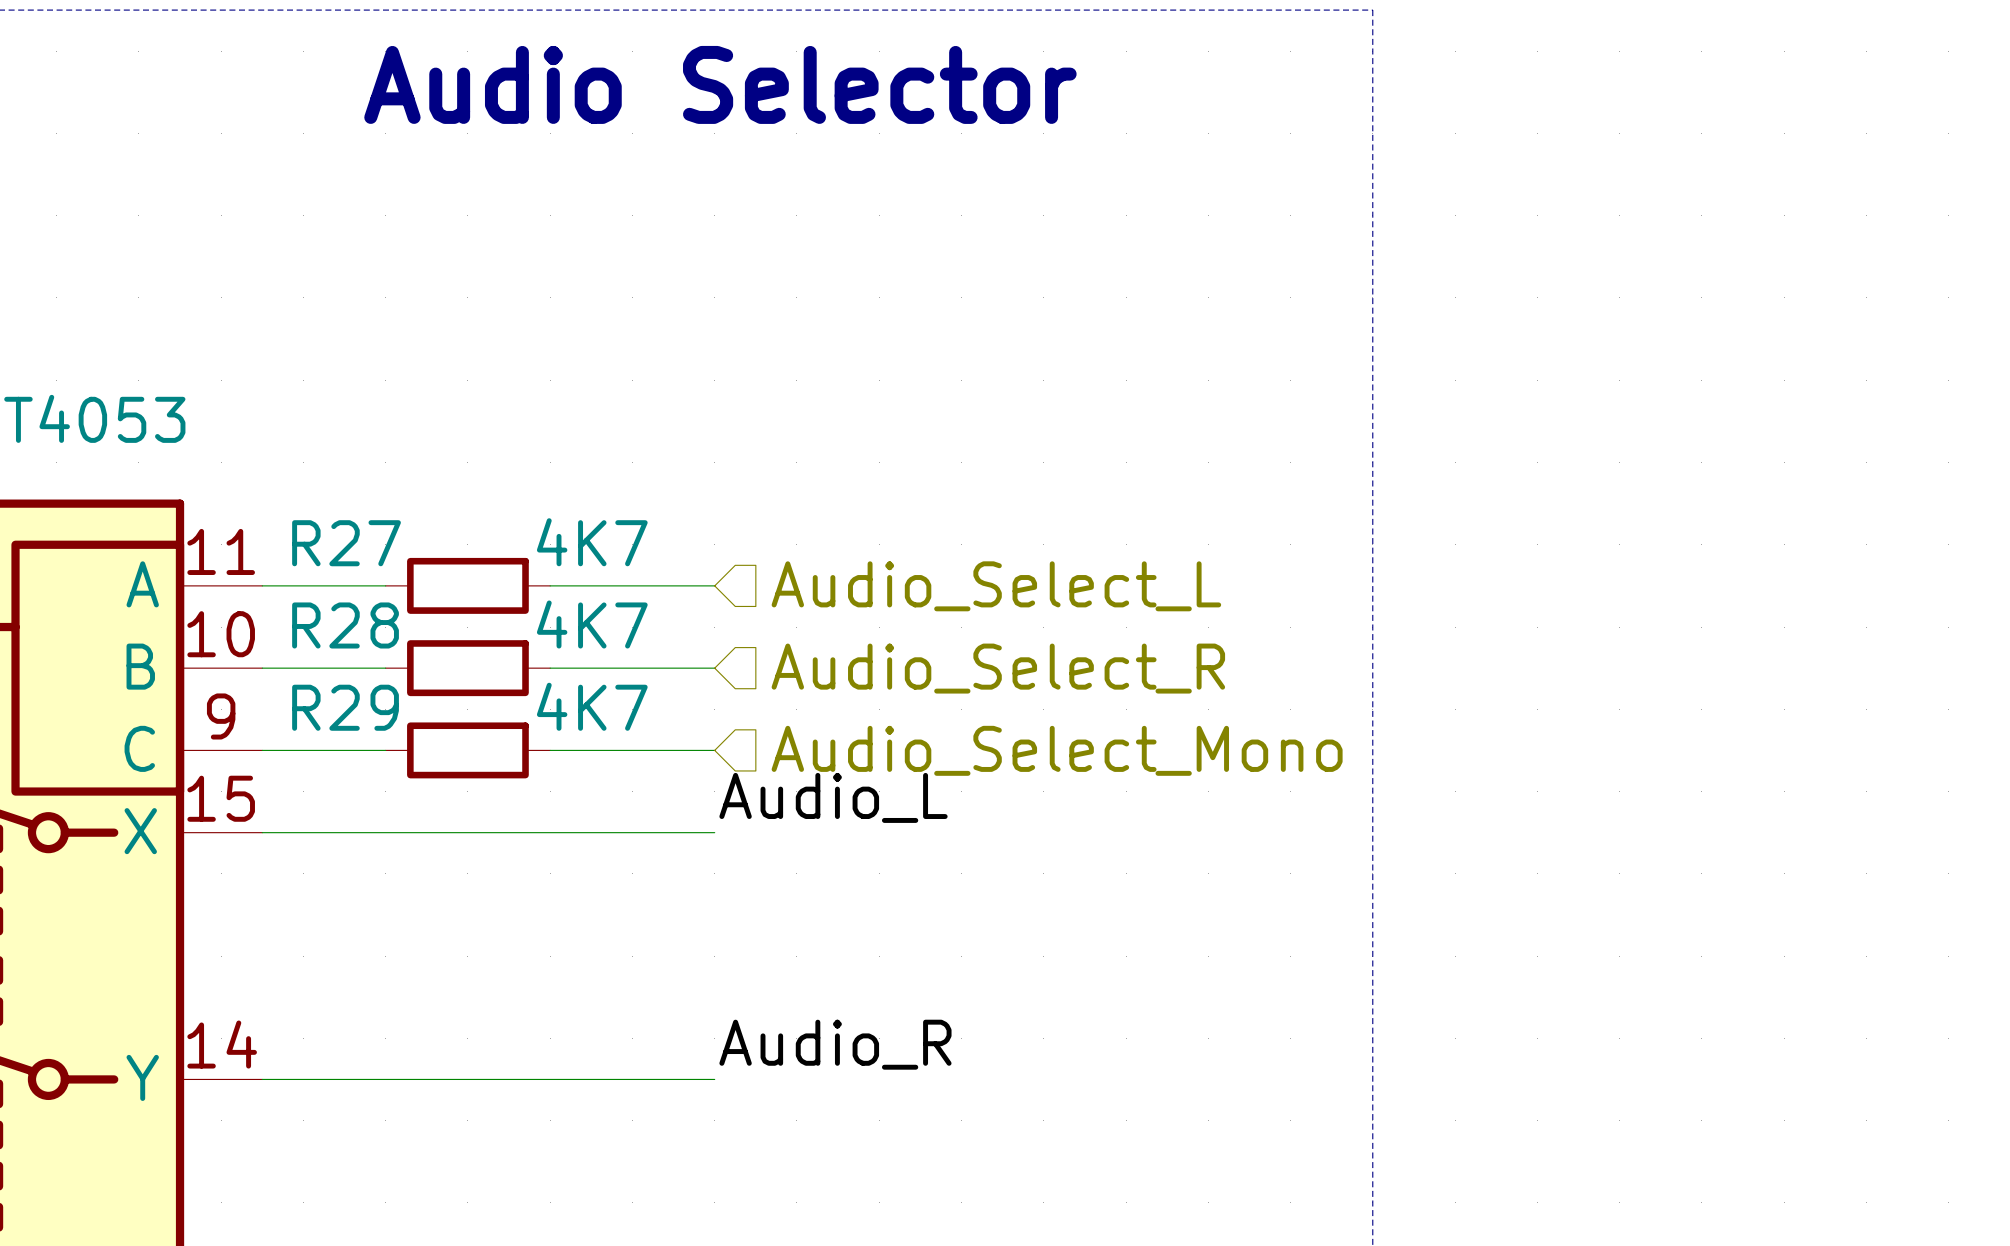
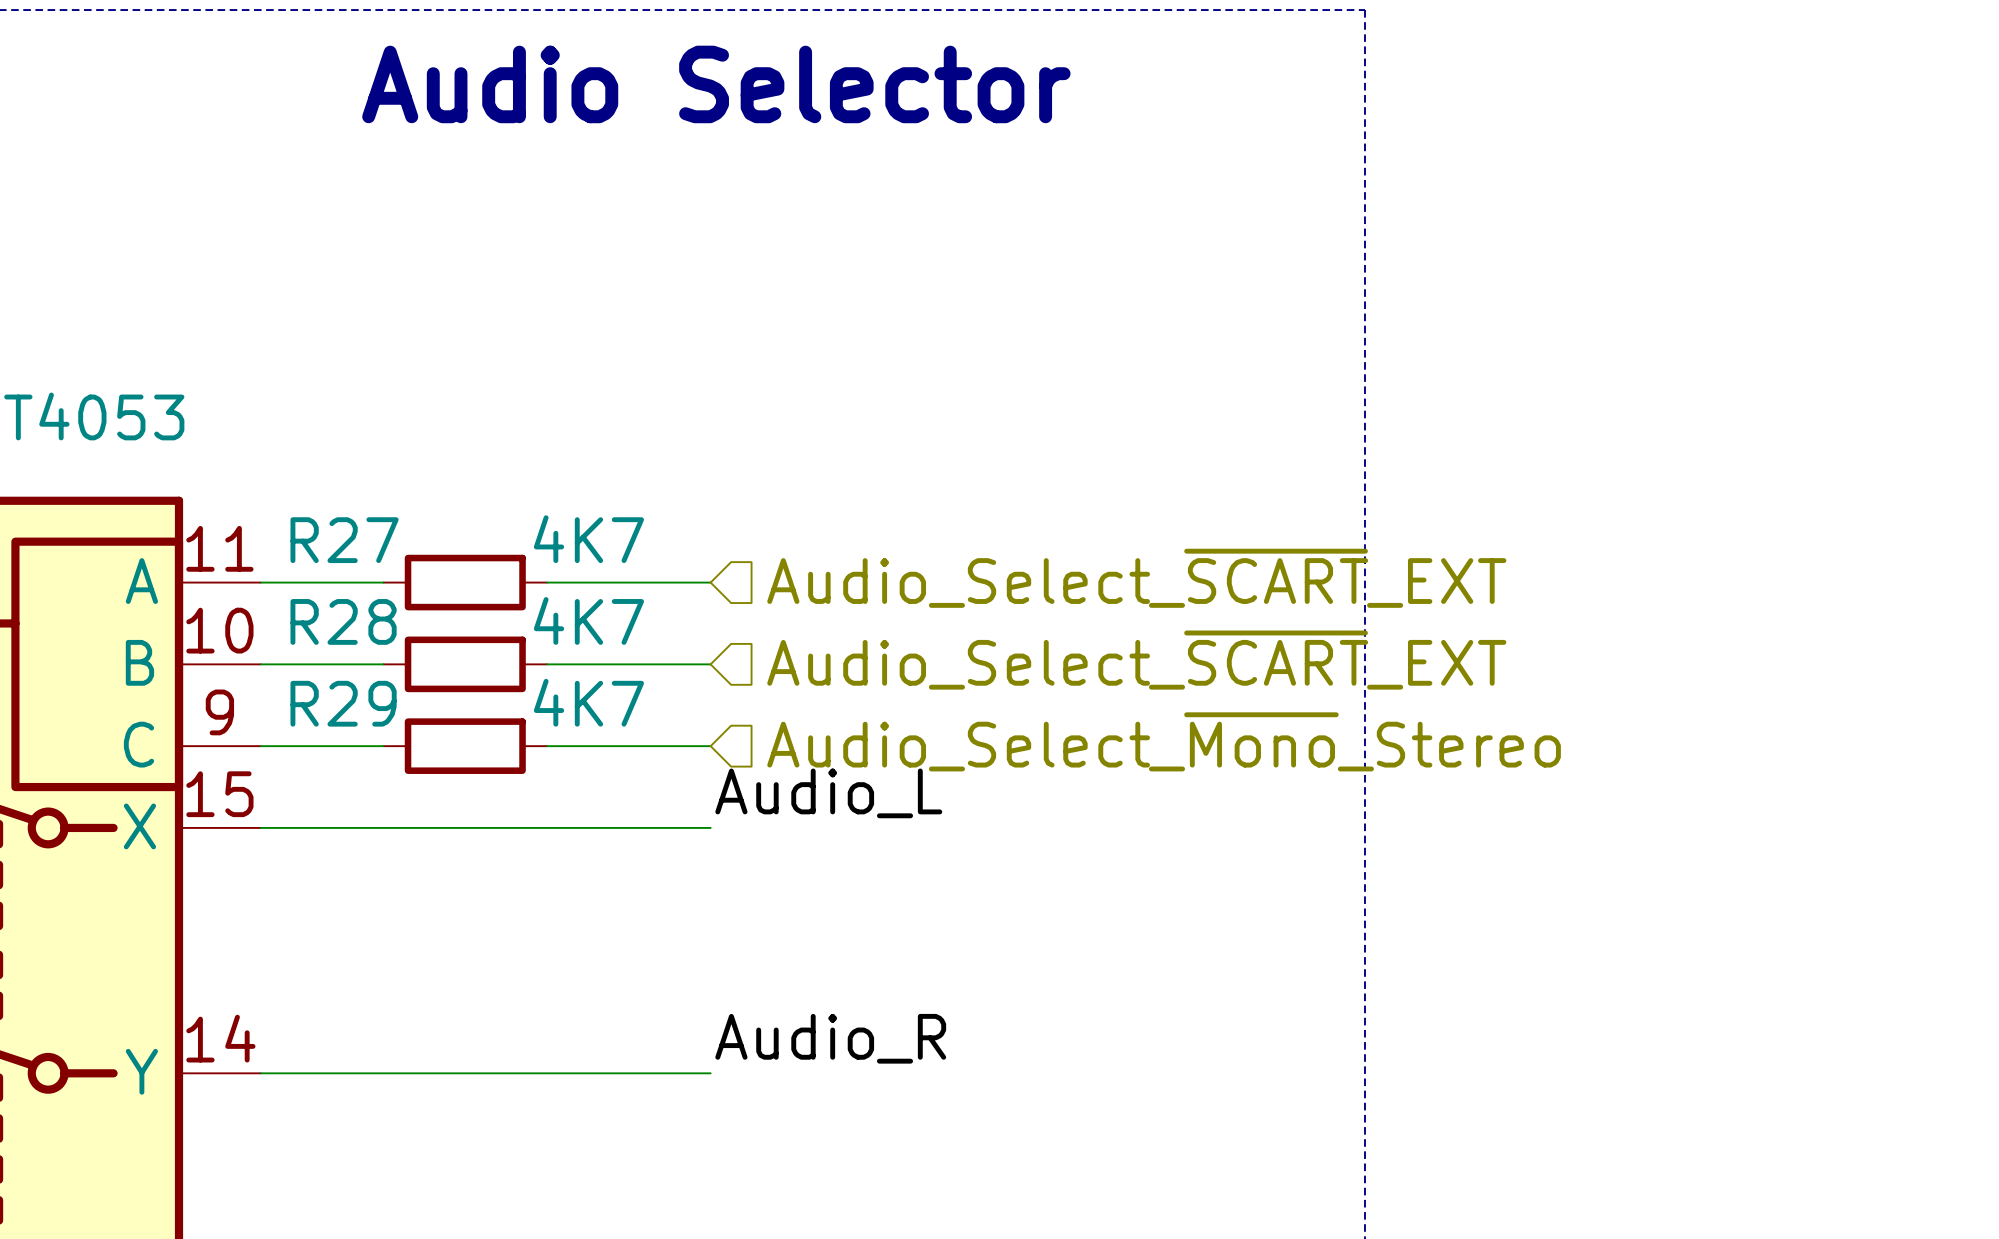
hierarchical label: Audio_Select_L (996, 586) -> Audio_Select_~{SCART}_EXT (1136, 578)
hierarchical label: Audio_Select_R (998, 668) -> Audio_Select_~{SCART}_EXT (1136, 660)
hierarchical label: Audio_Select_Mono (1057, 750) -> Audio_Select_~{Mono}_Stereo (1164, 741)

